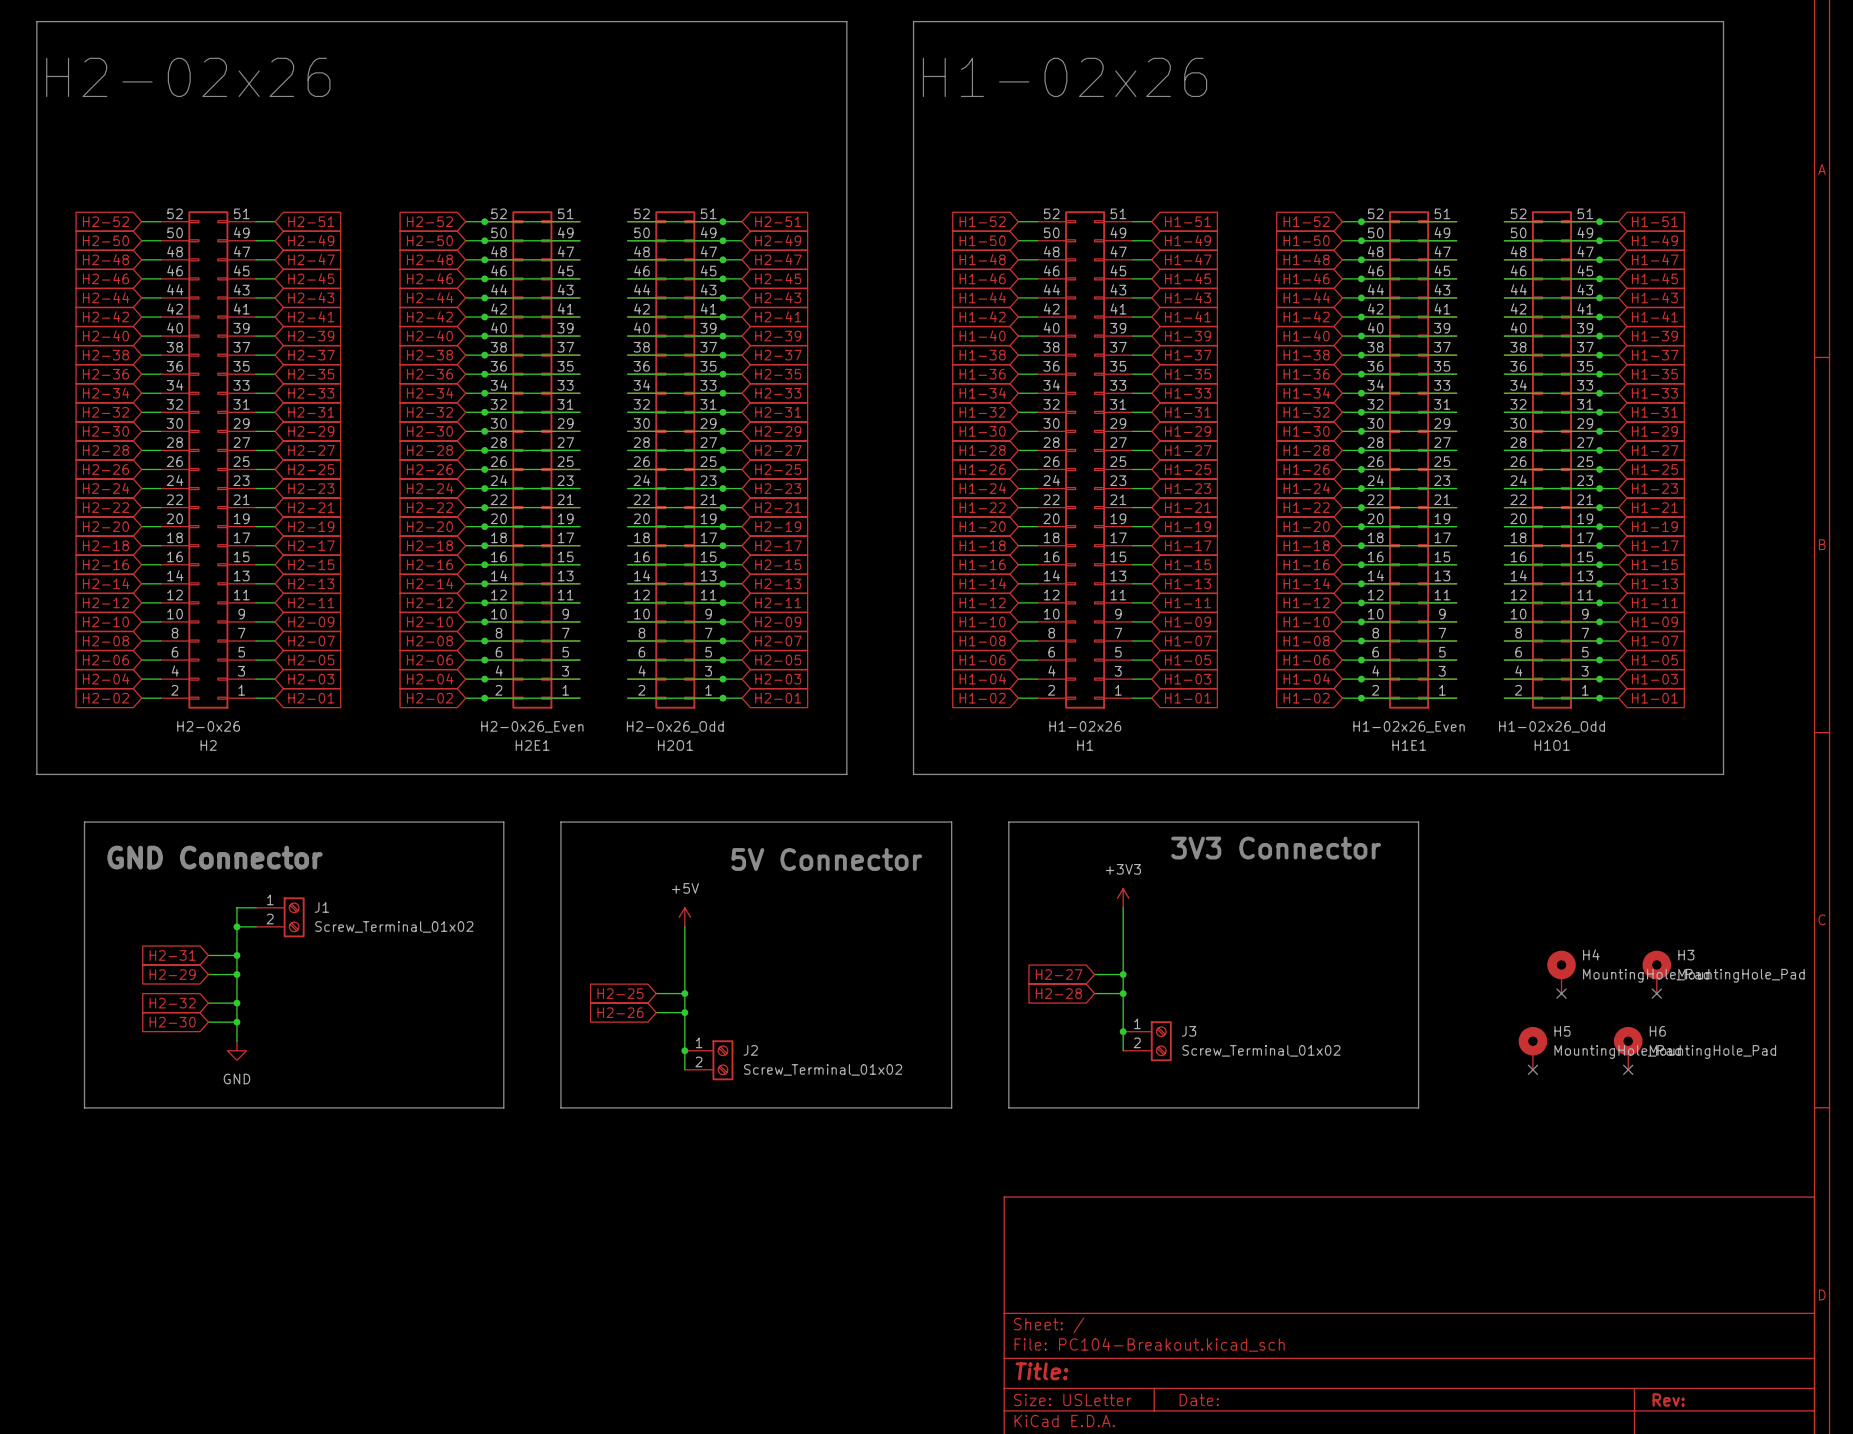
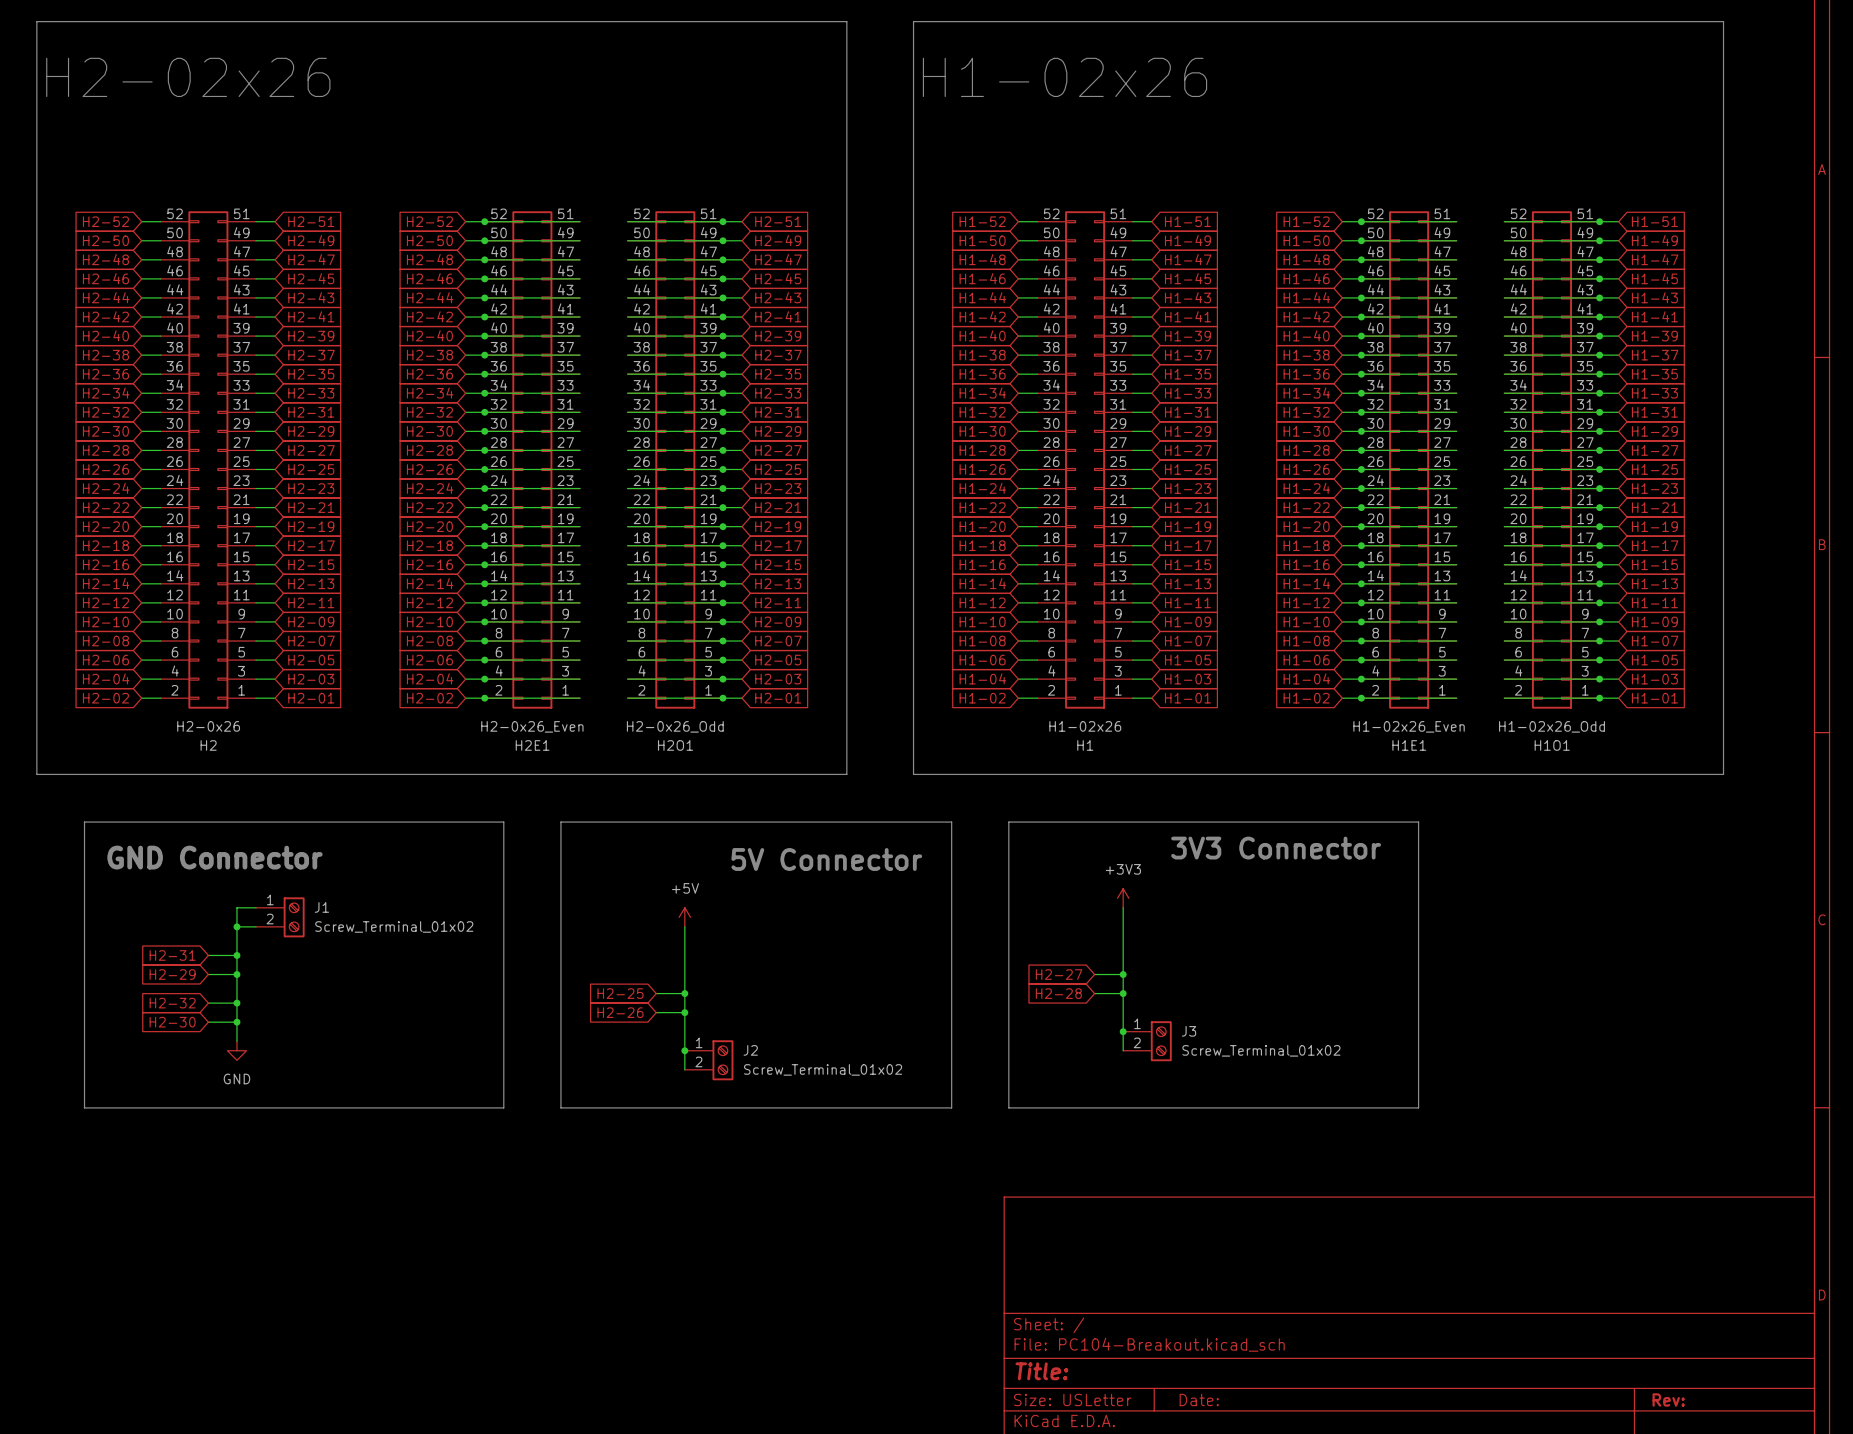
H4: MountingHole_Pad (1561, 972) -> none
H3: MountingHole_Pad (1656, 972) -> none
no-connect mark: (1561, 993) -> none
no-connect mark: (1656, 993) -> none
H5: MountingHole_Pad (1532, 1048) -> none
H6: MountingHole_Pad (1628, 1048) -> none
no-connect mark: (1532, 1069) -> none
no-connect mark: (1628, 1069) -> none

